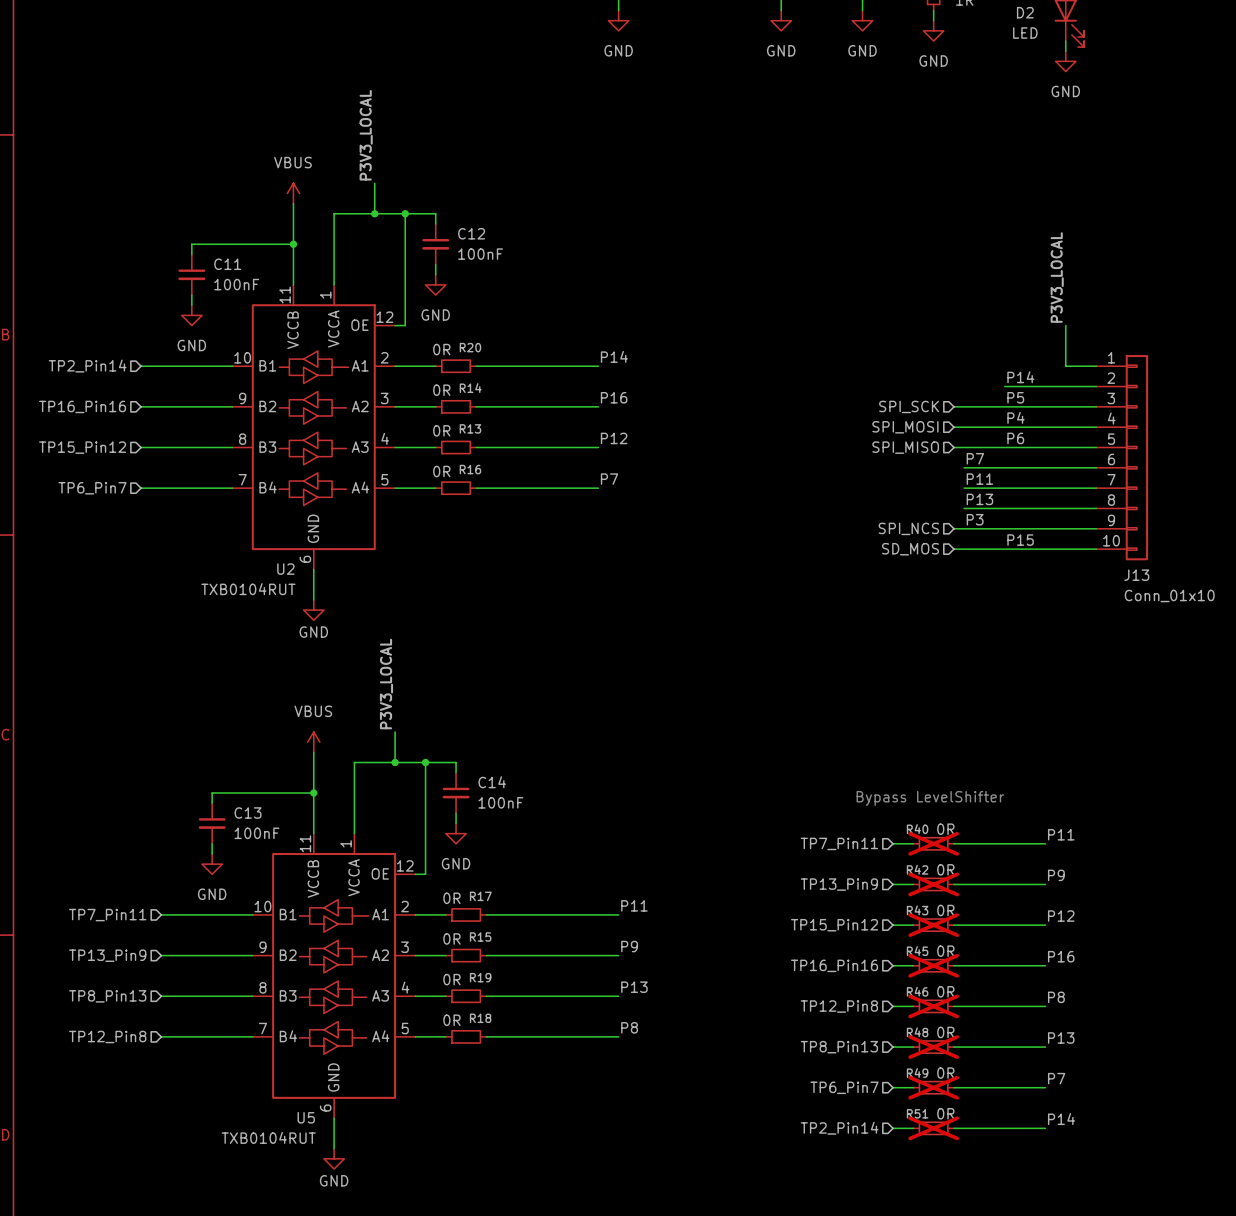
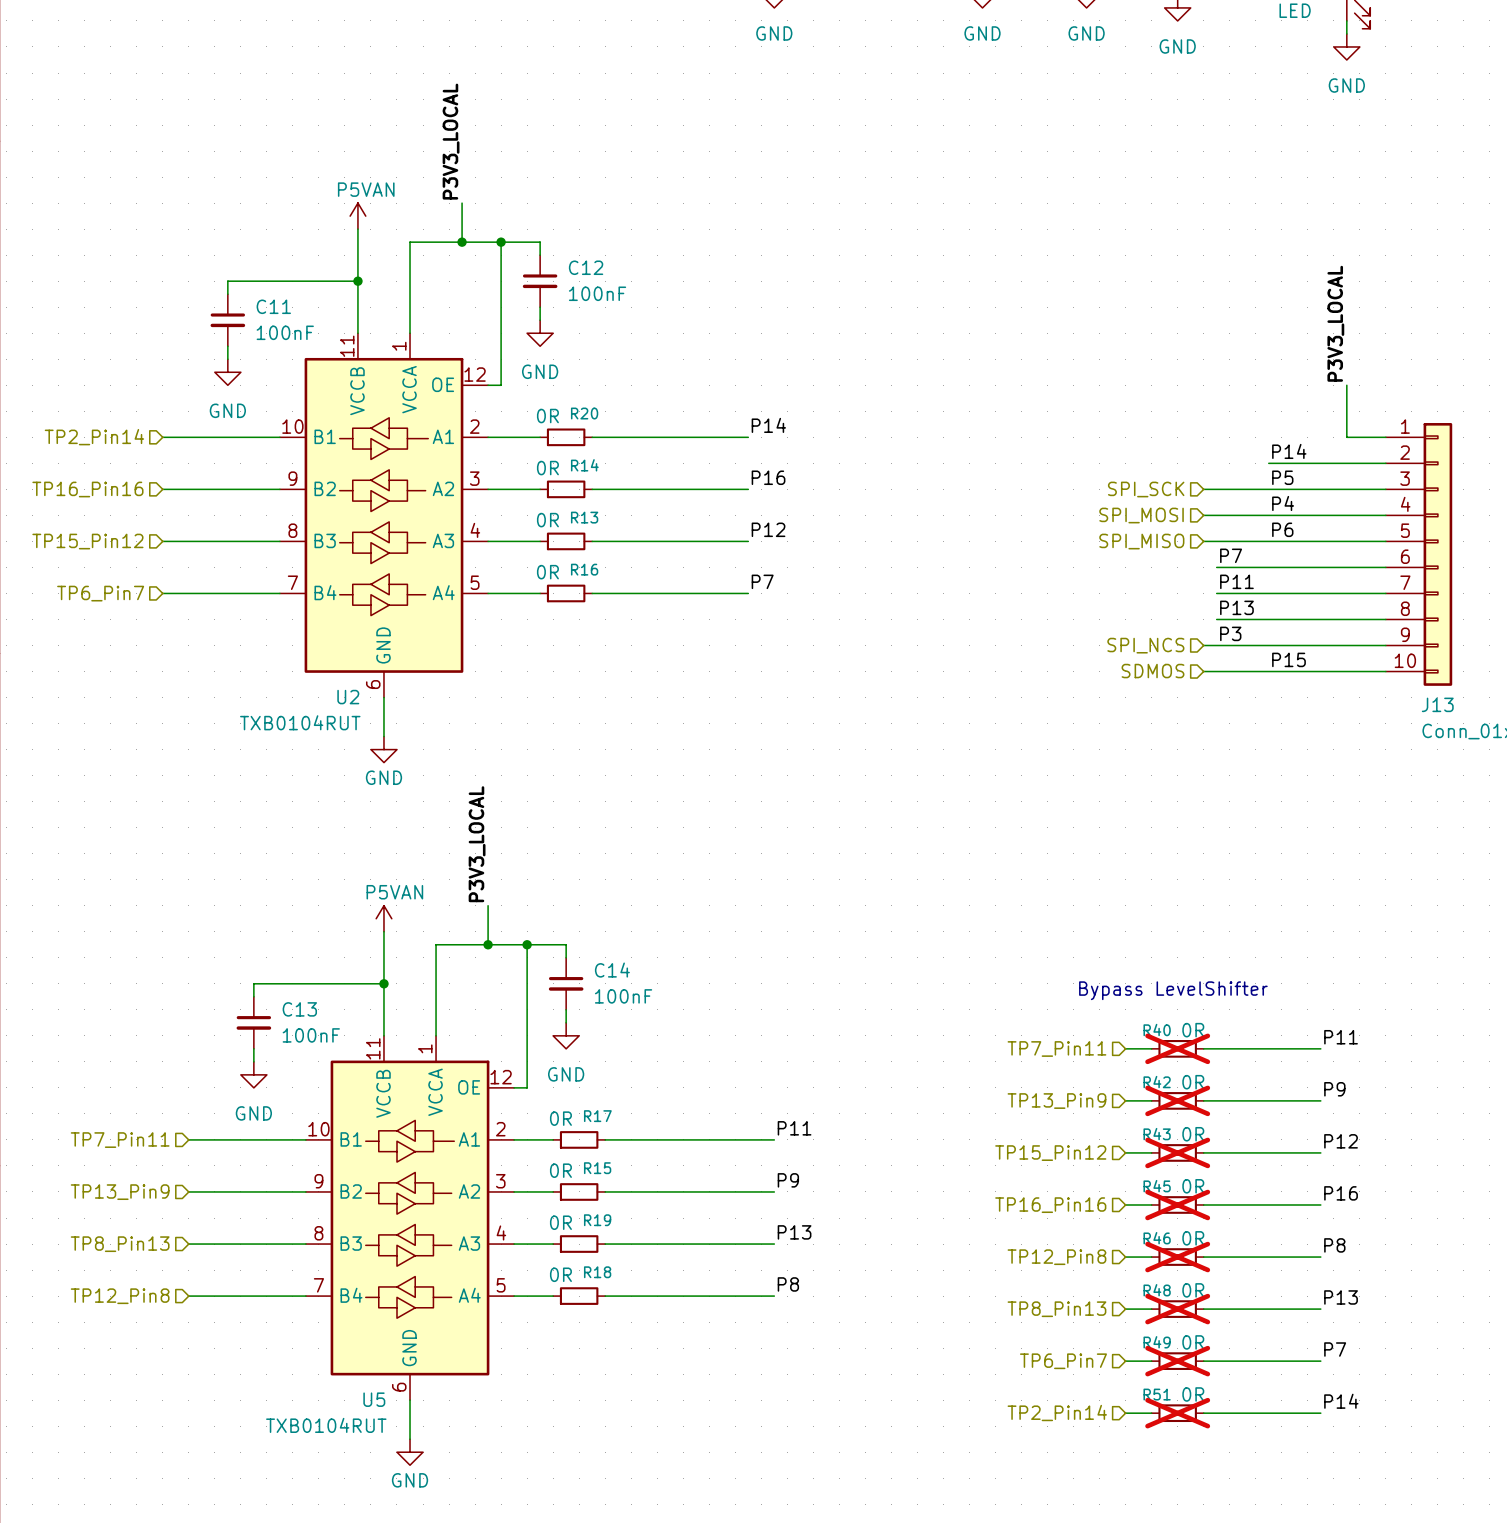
power symbol: VBUS (293, 193) -> P5VAN (357, 216)
hierarchical label: SD_MOS (910, 549) -> SDMOS (1153, 671)
power symbol: VBUS (313, 742) -> P5VAN (383, 918)

